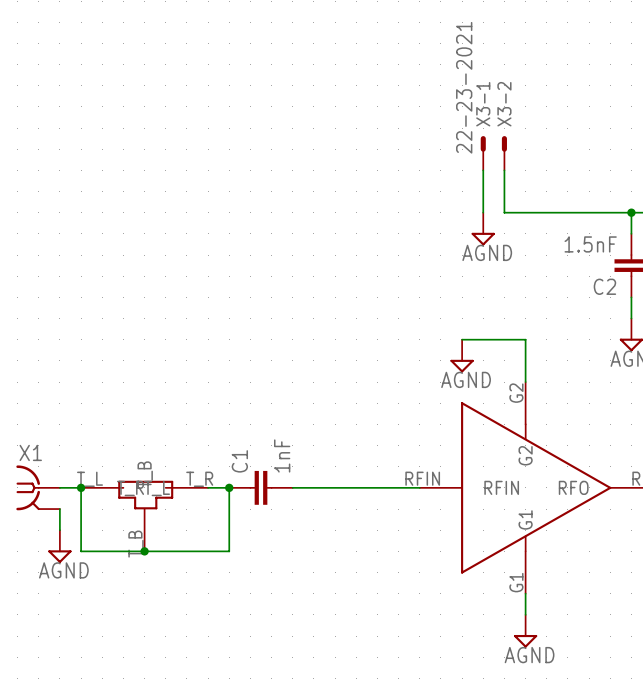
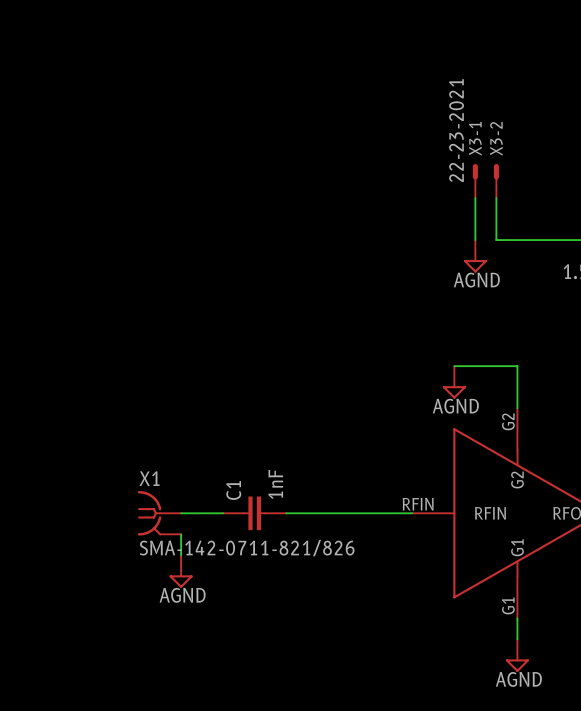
X1 position: (38, 487) -> (159, 513)
wire: (59, 487) (81, 487) (81, 551) (229, 551) (229, 487) -> none
junction: (81, 487) -> none
junction: (229, 487) -> none
wire: (59, 509) (59, 530) -> (181, 534) (181, 555)
part: (144, 516) -> none
X1 value: none -> SMA-142-0711-821/826 (247, 548)
power symbol position: AGND (59, 546) -> AGND (181, 571)
junction: (144, 551) -> none

